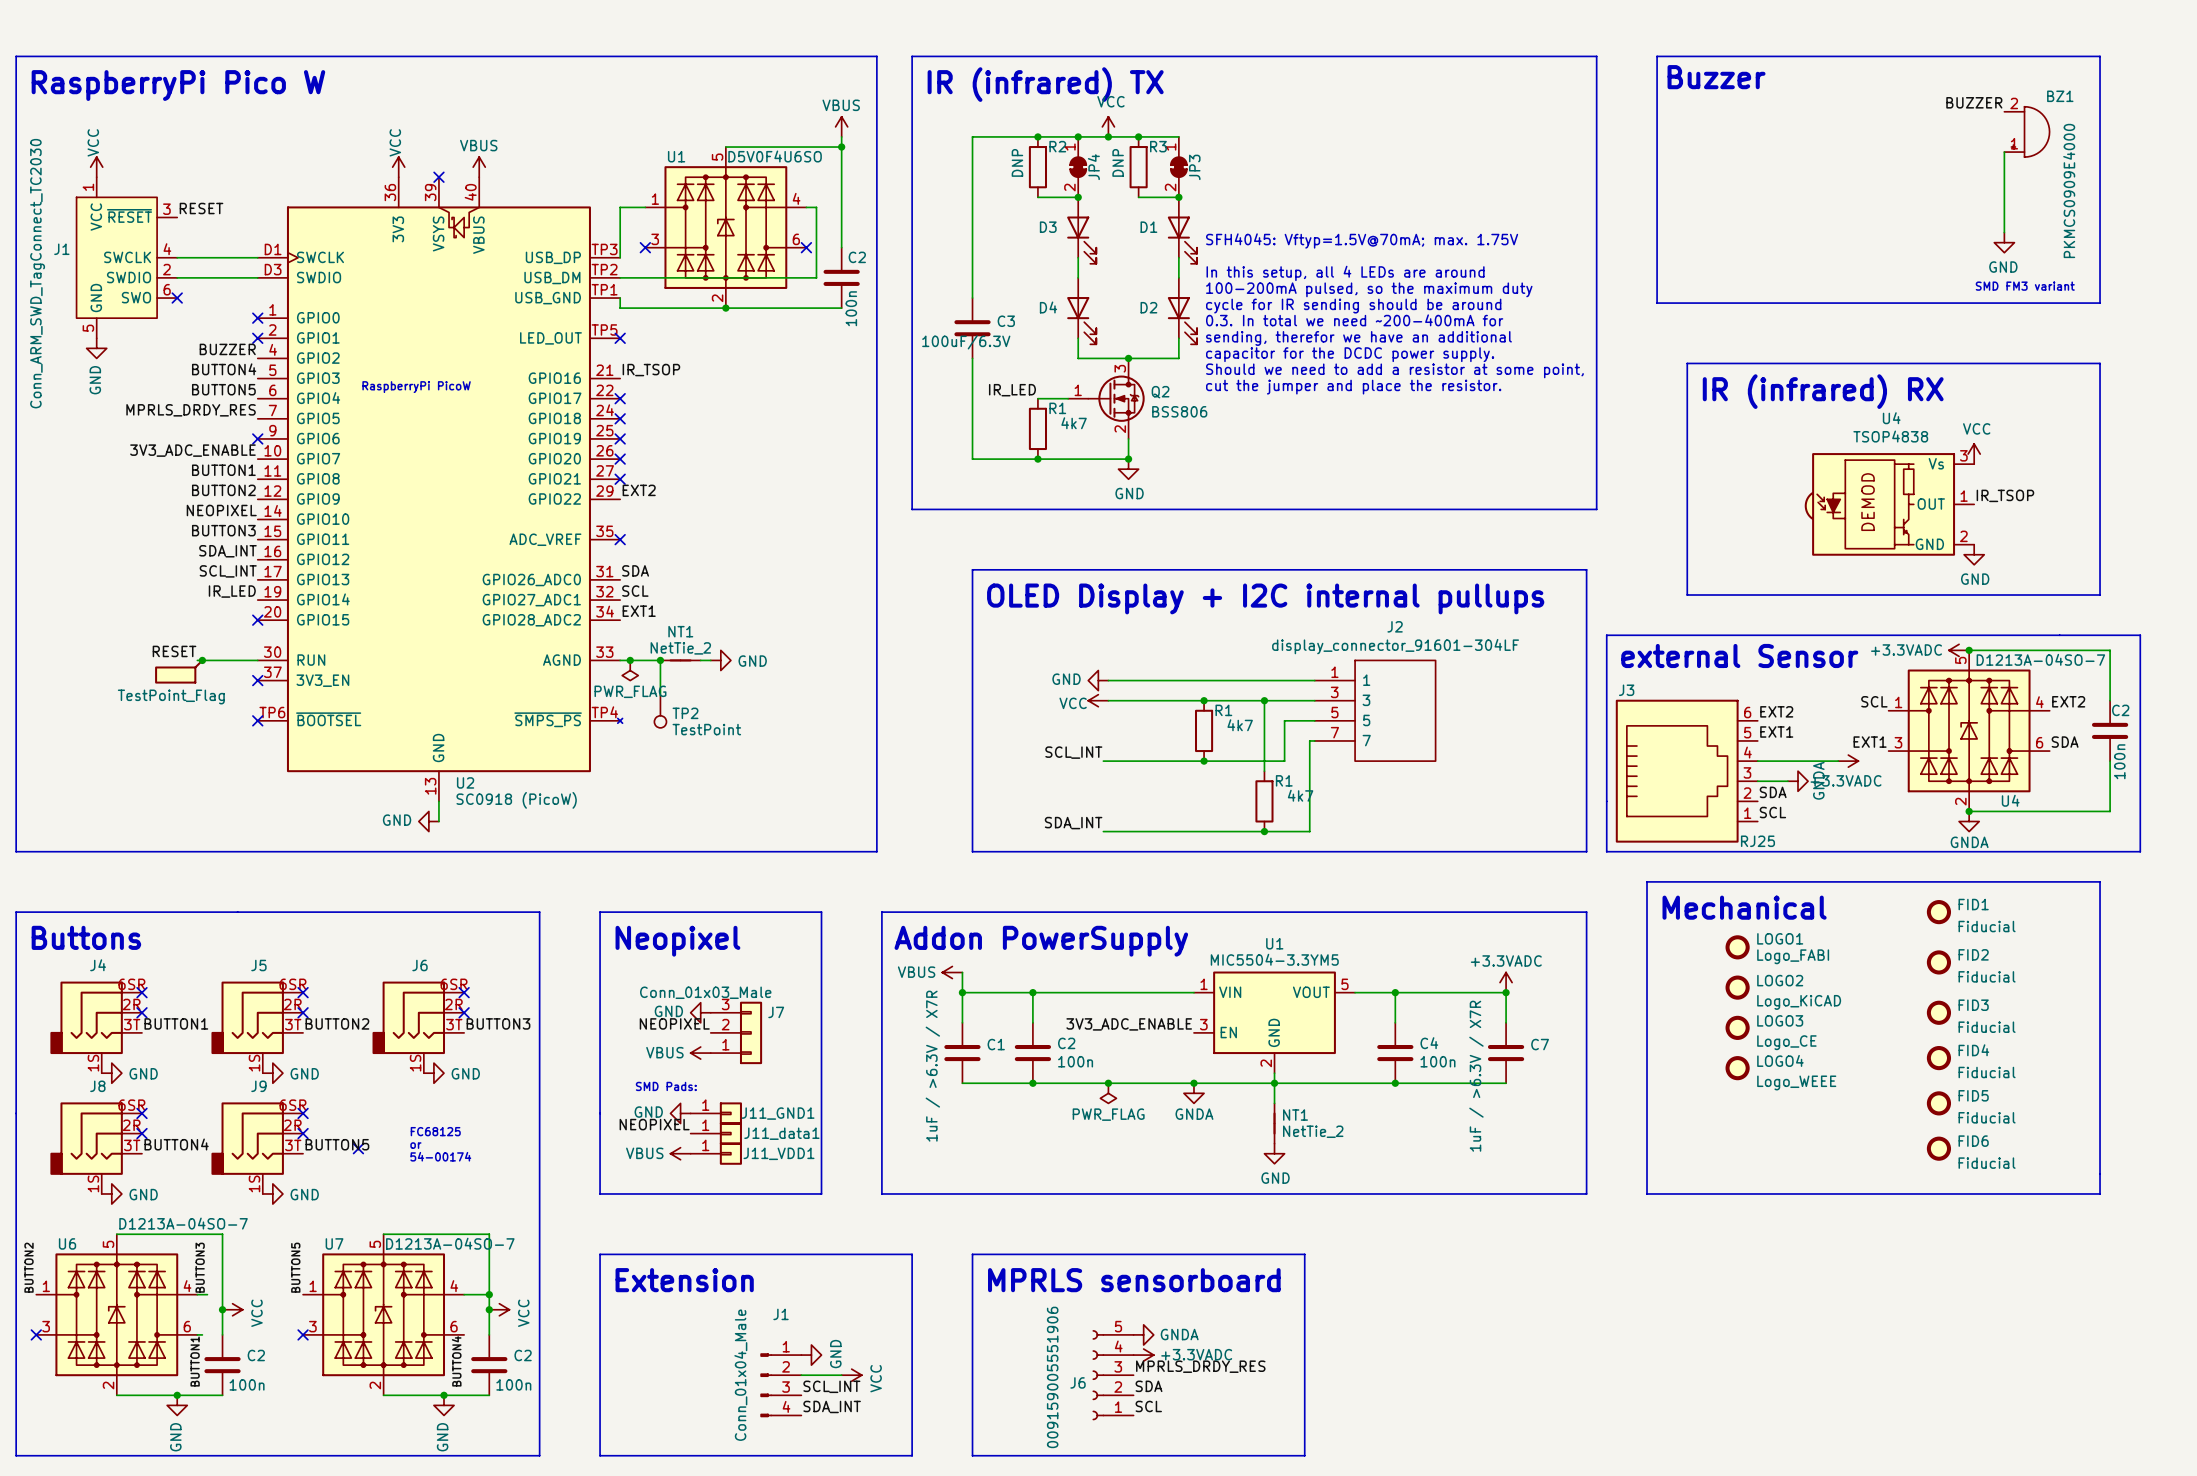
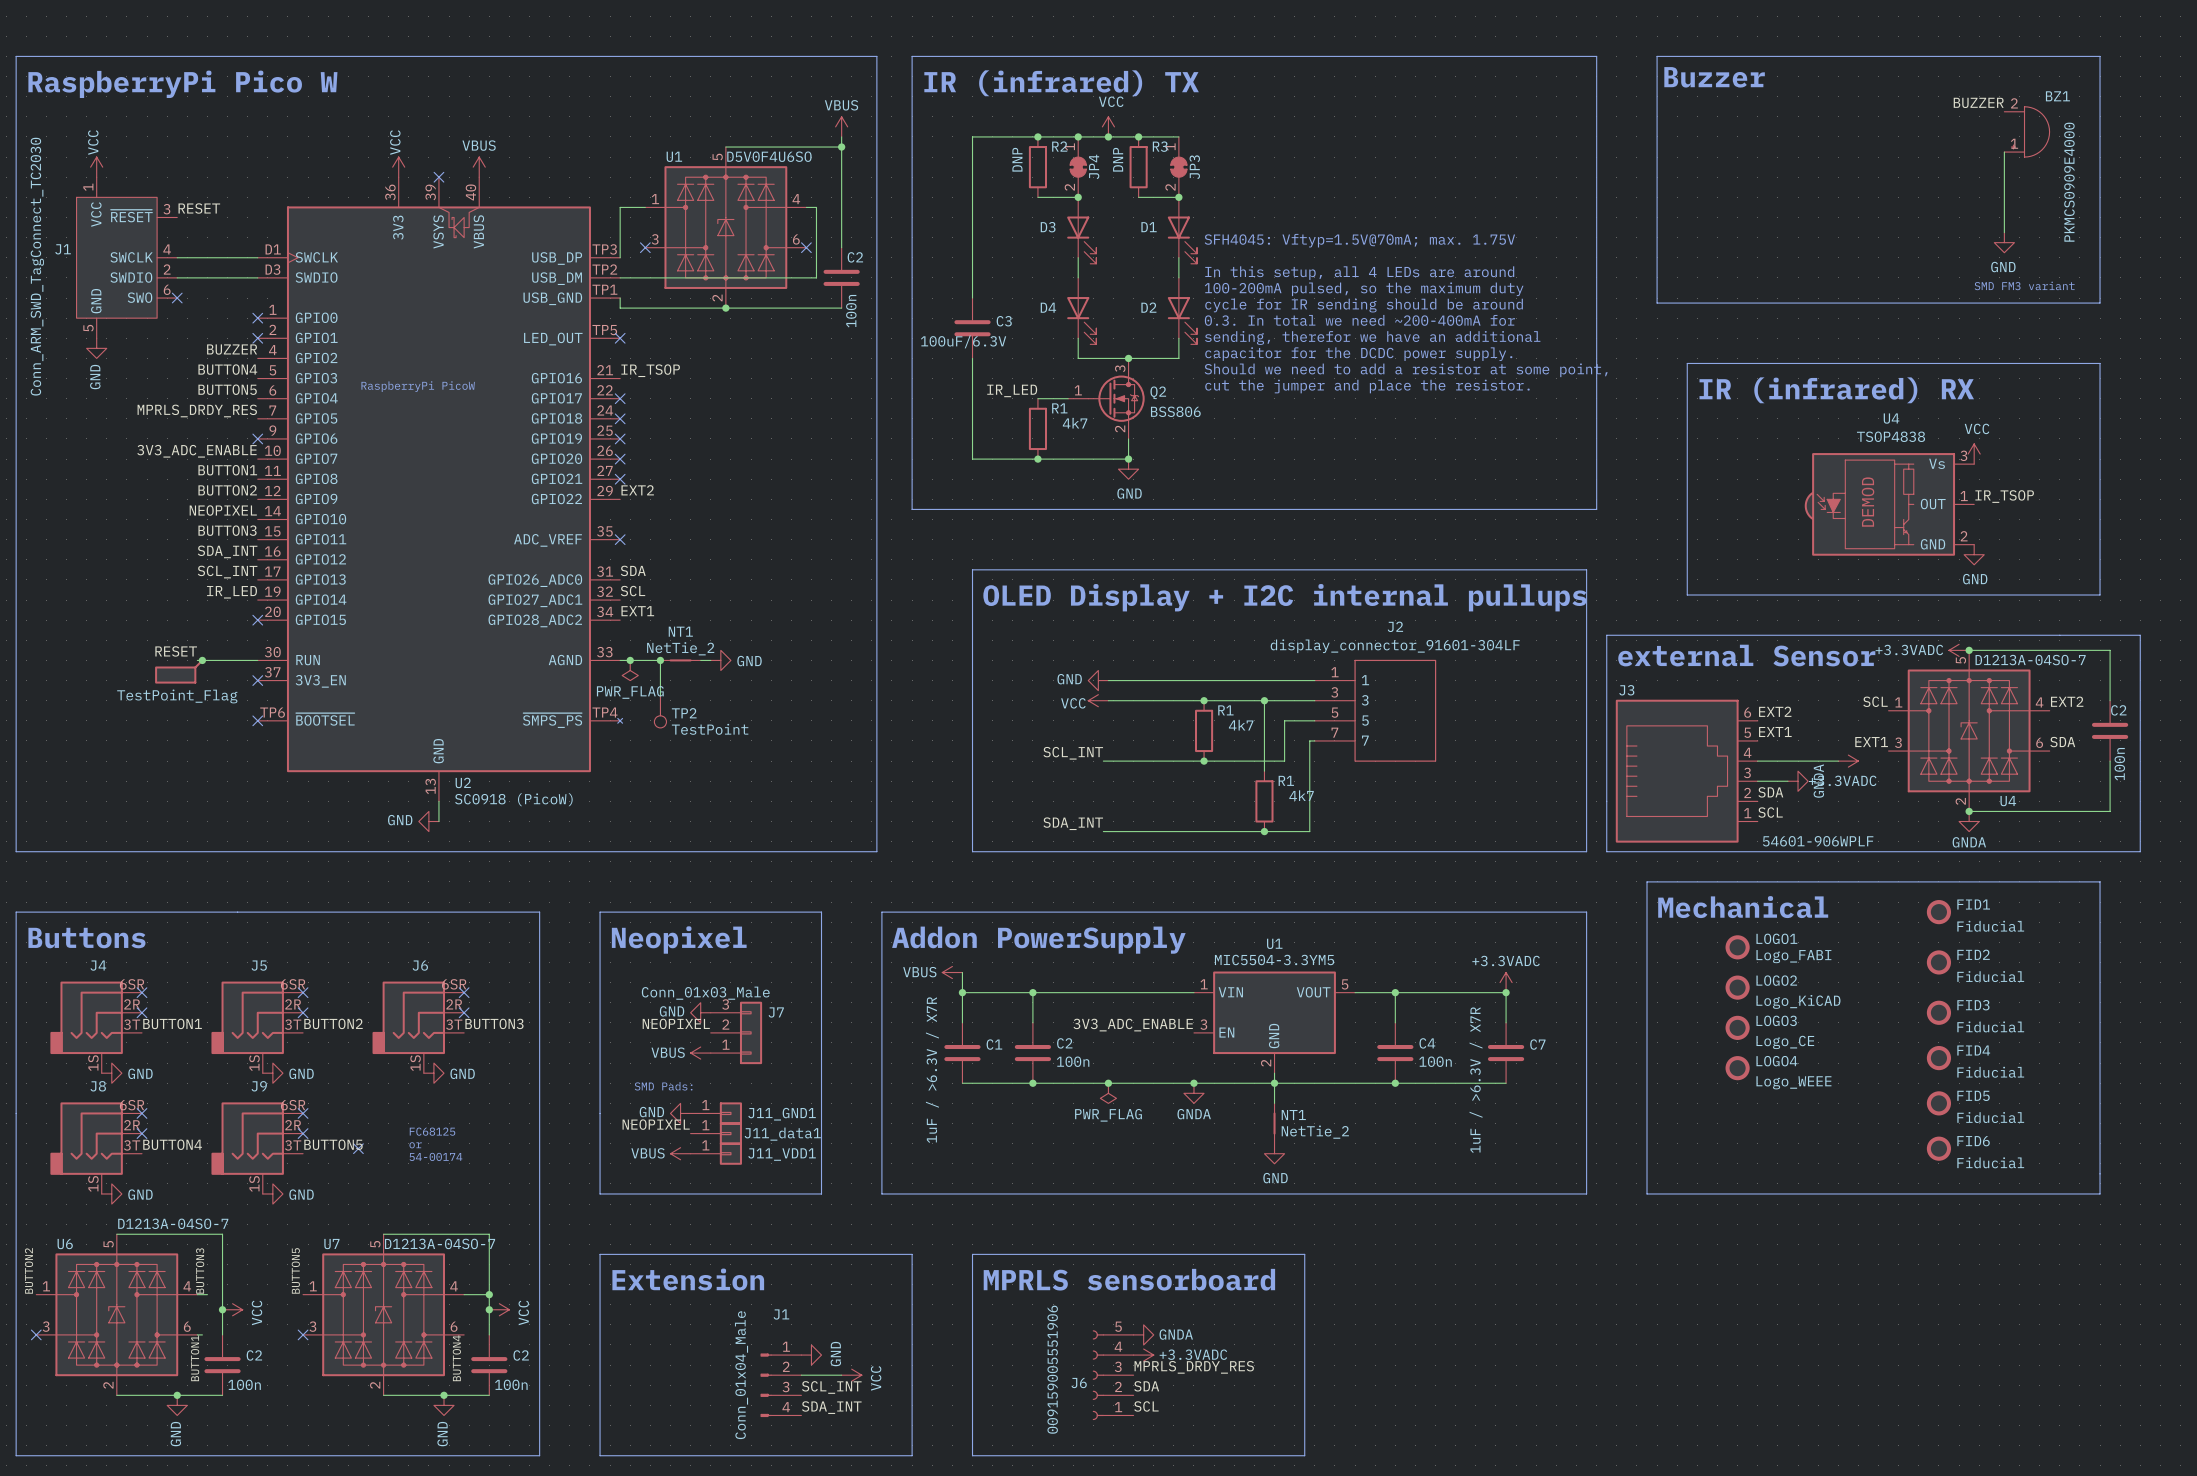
J3 value: RJ25 (1757, 841) -> 54601-906WPLF (1818, 841)

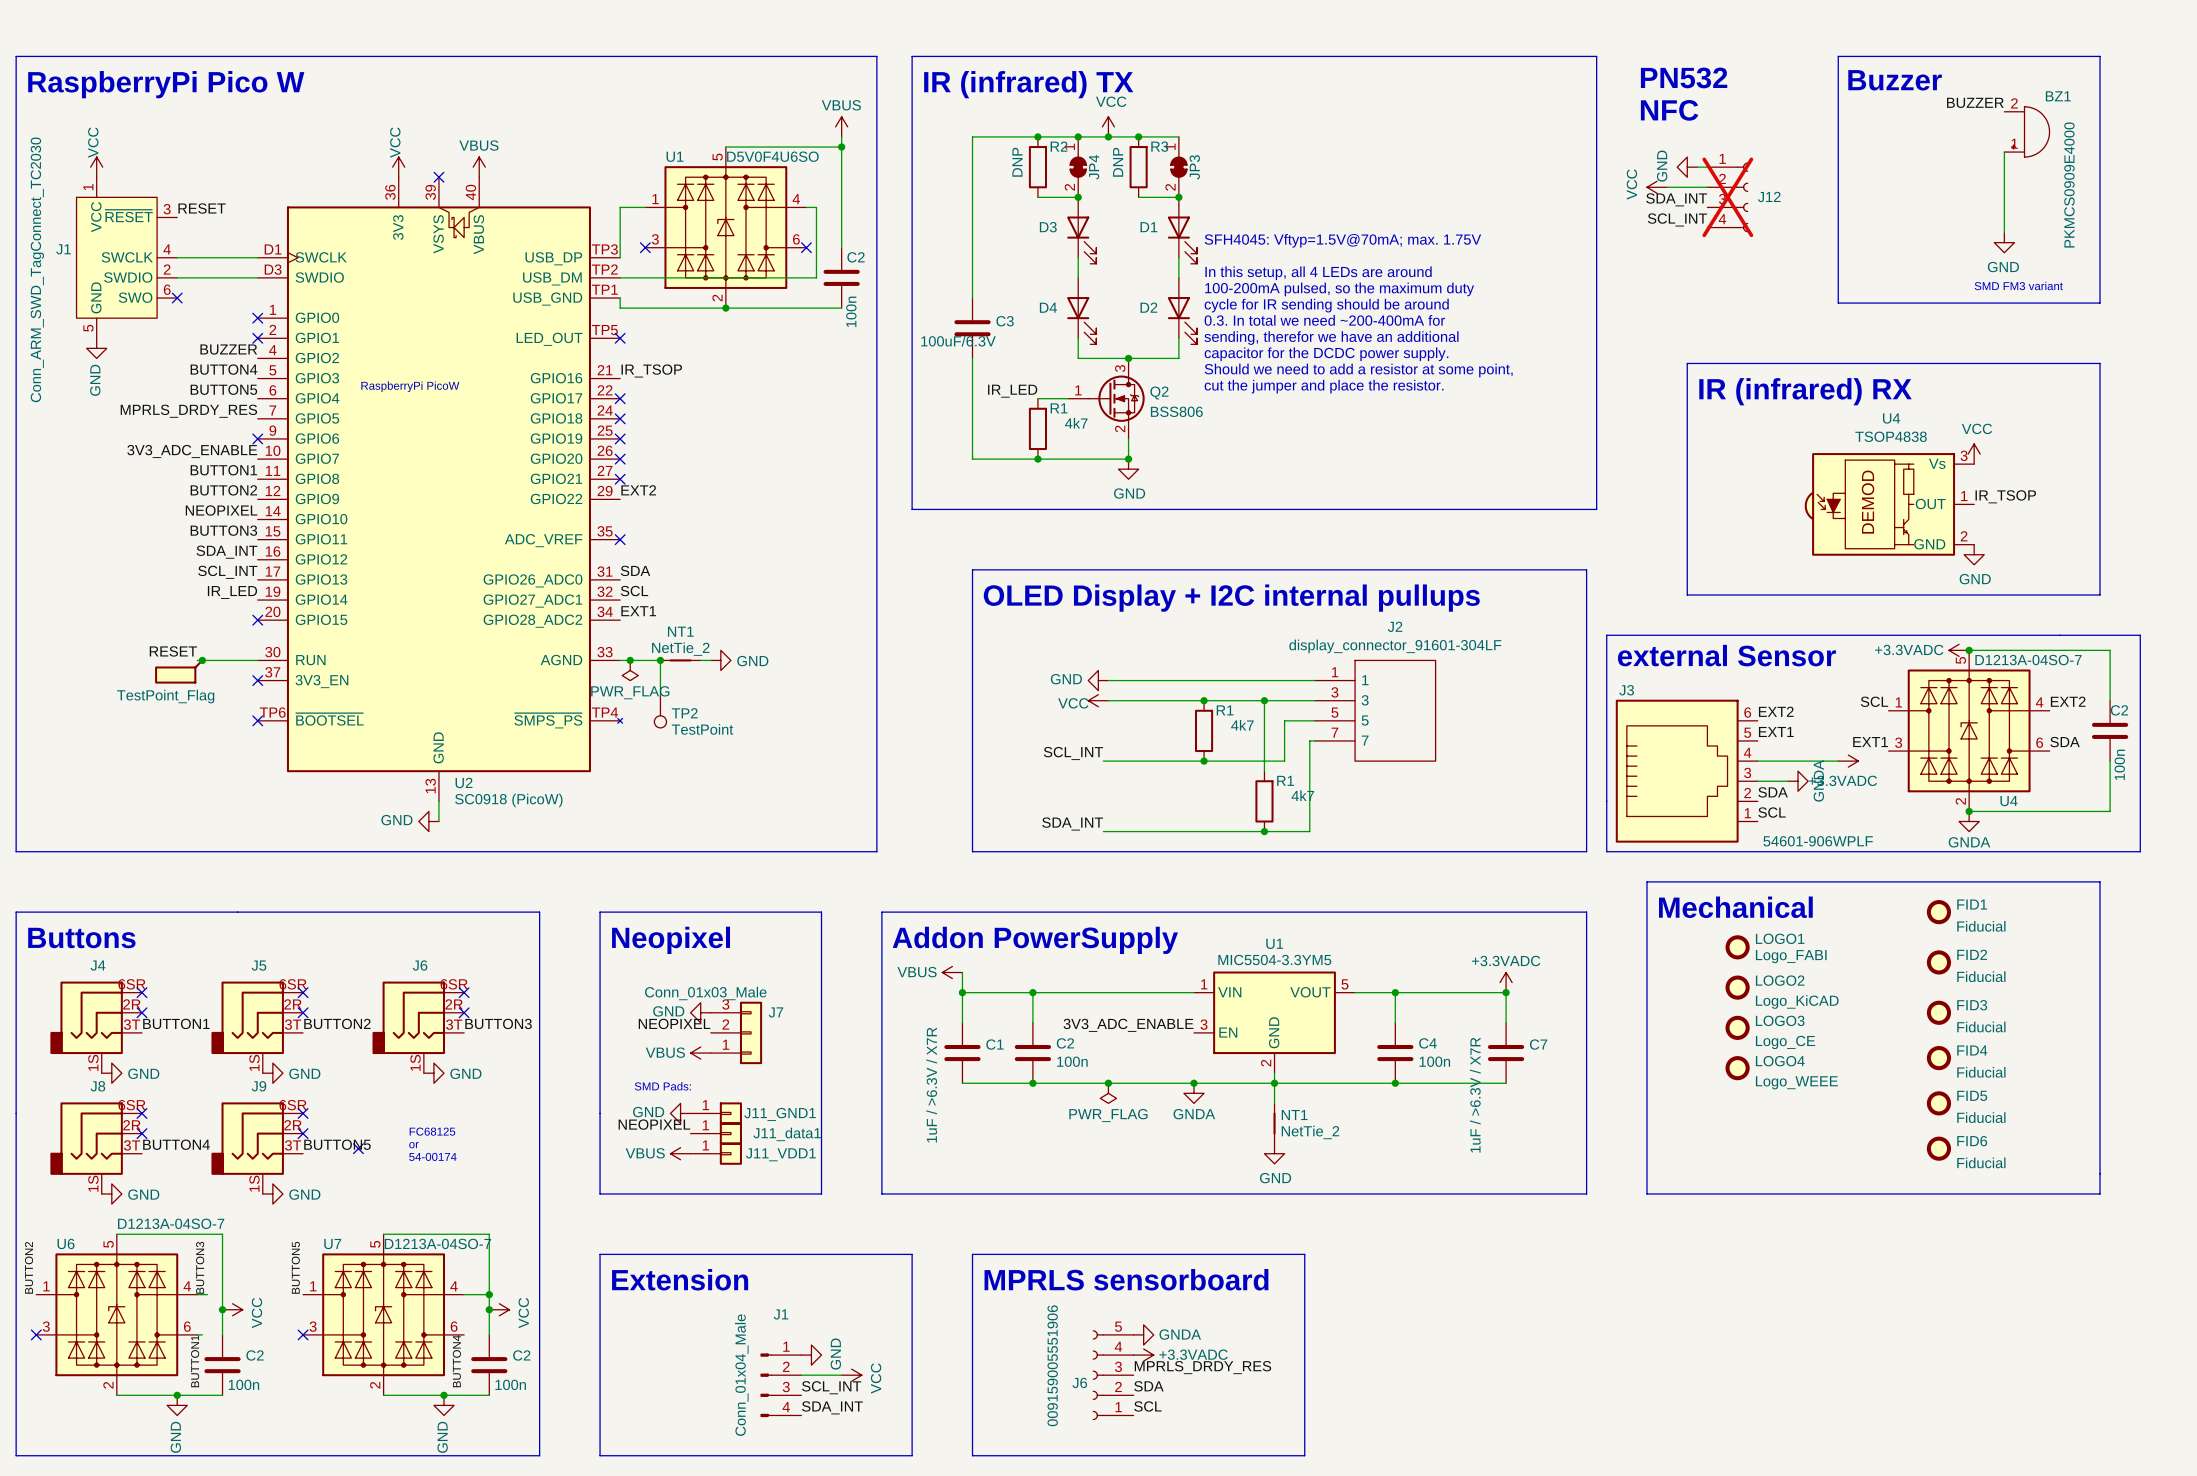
line: (1838, 56) (1657, 56) (1657, 303) (1838, 303) -> (1838, 56) (1838, 303)
text: none -> PN532 (1684, 77)
text position: Buzzer (1714, 77) -> Buzzer (1895, 80)
text: none -> NFC (1669, 110)
power symbol: none -> GND (1687, 167)
wire: none -> (1697, 167) (1707, 167)
power symbol: none -> VCC (1657, 187)
wire: none -> (1667, 187) (1707, 187)
J12: none -> (1727, 197)
label: none -> SDA_INT (1676, 199)
label: none -> SCL_INT (1677, 219)

